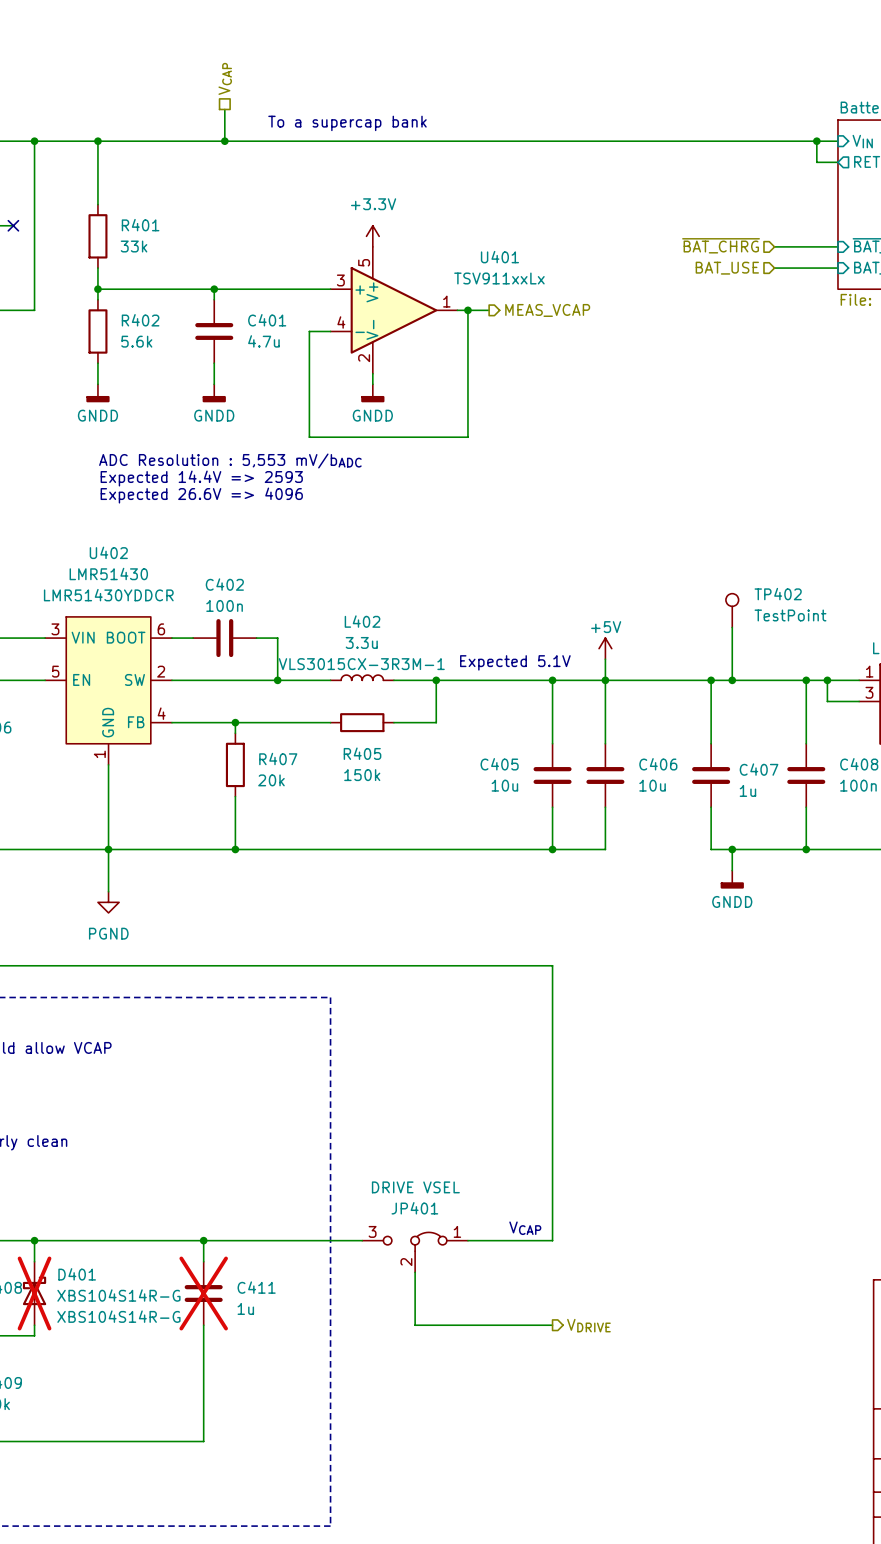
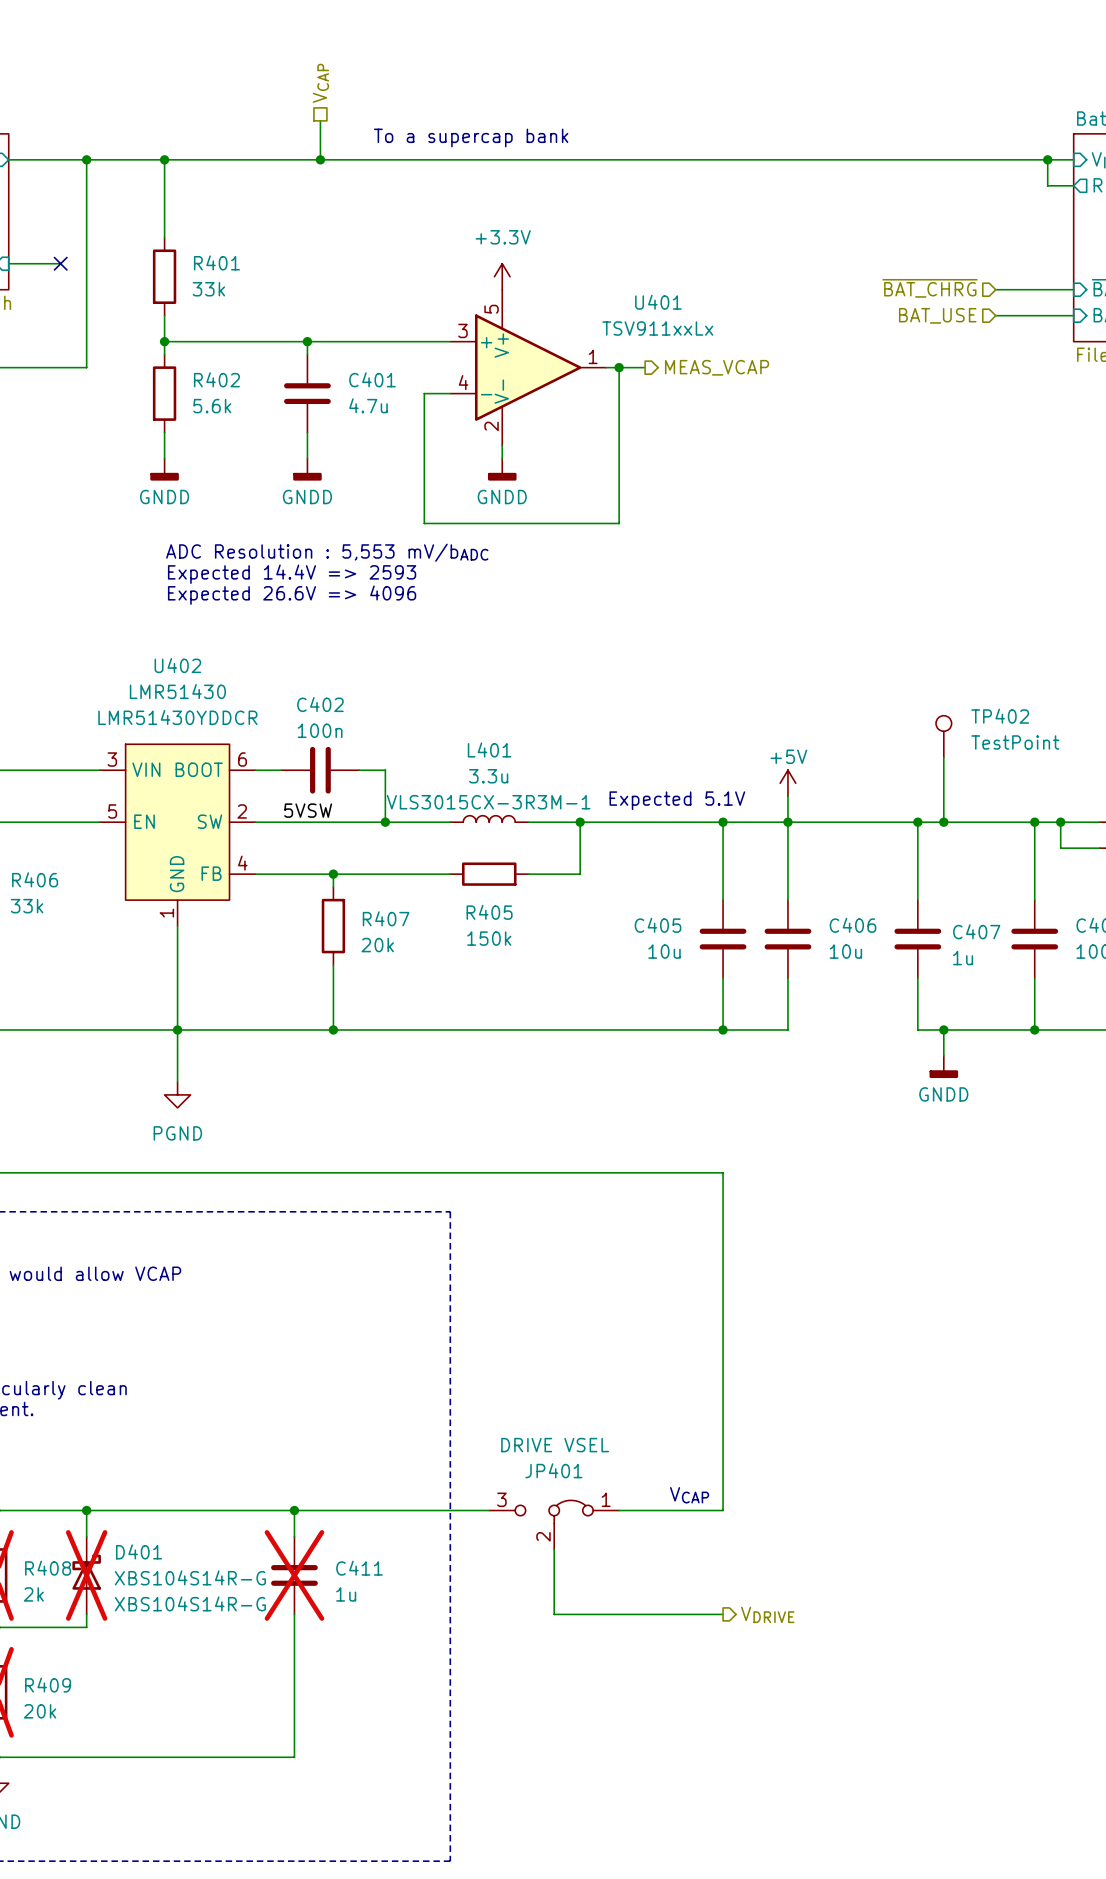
L402 name: L402 (362, 621) -> L401 (489, 749)
label: none -> 5VSW (308, 810)

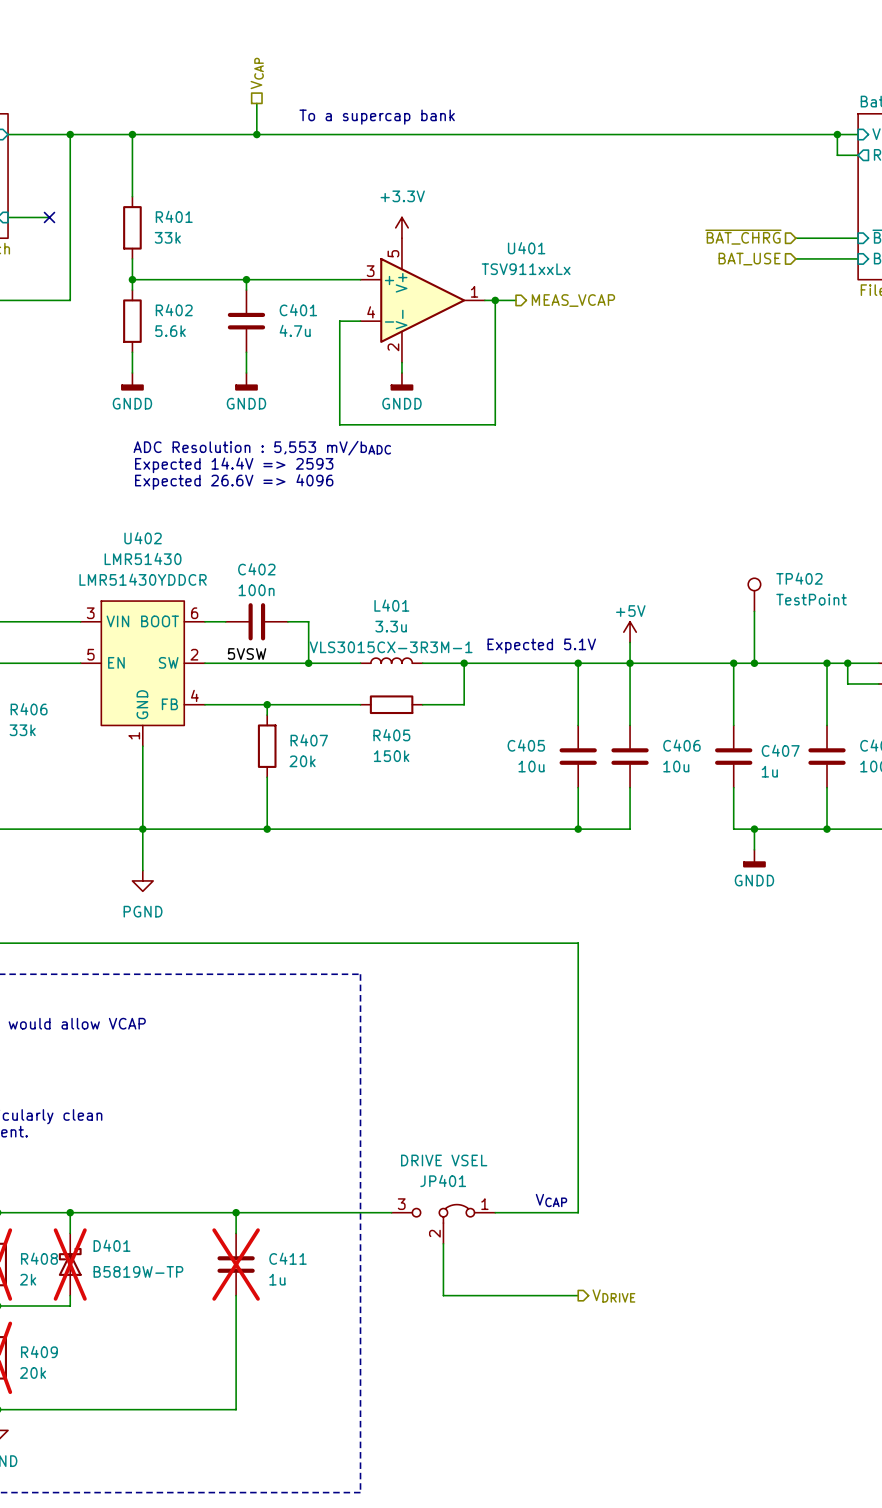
D401 value: XBS104S14R-G (190, 1577) -> B5819W-TP (138, 1271)
D401 text: XBS104S14R-G (190, 1603) -> none

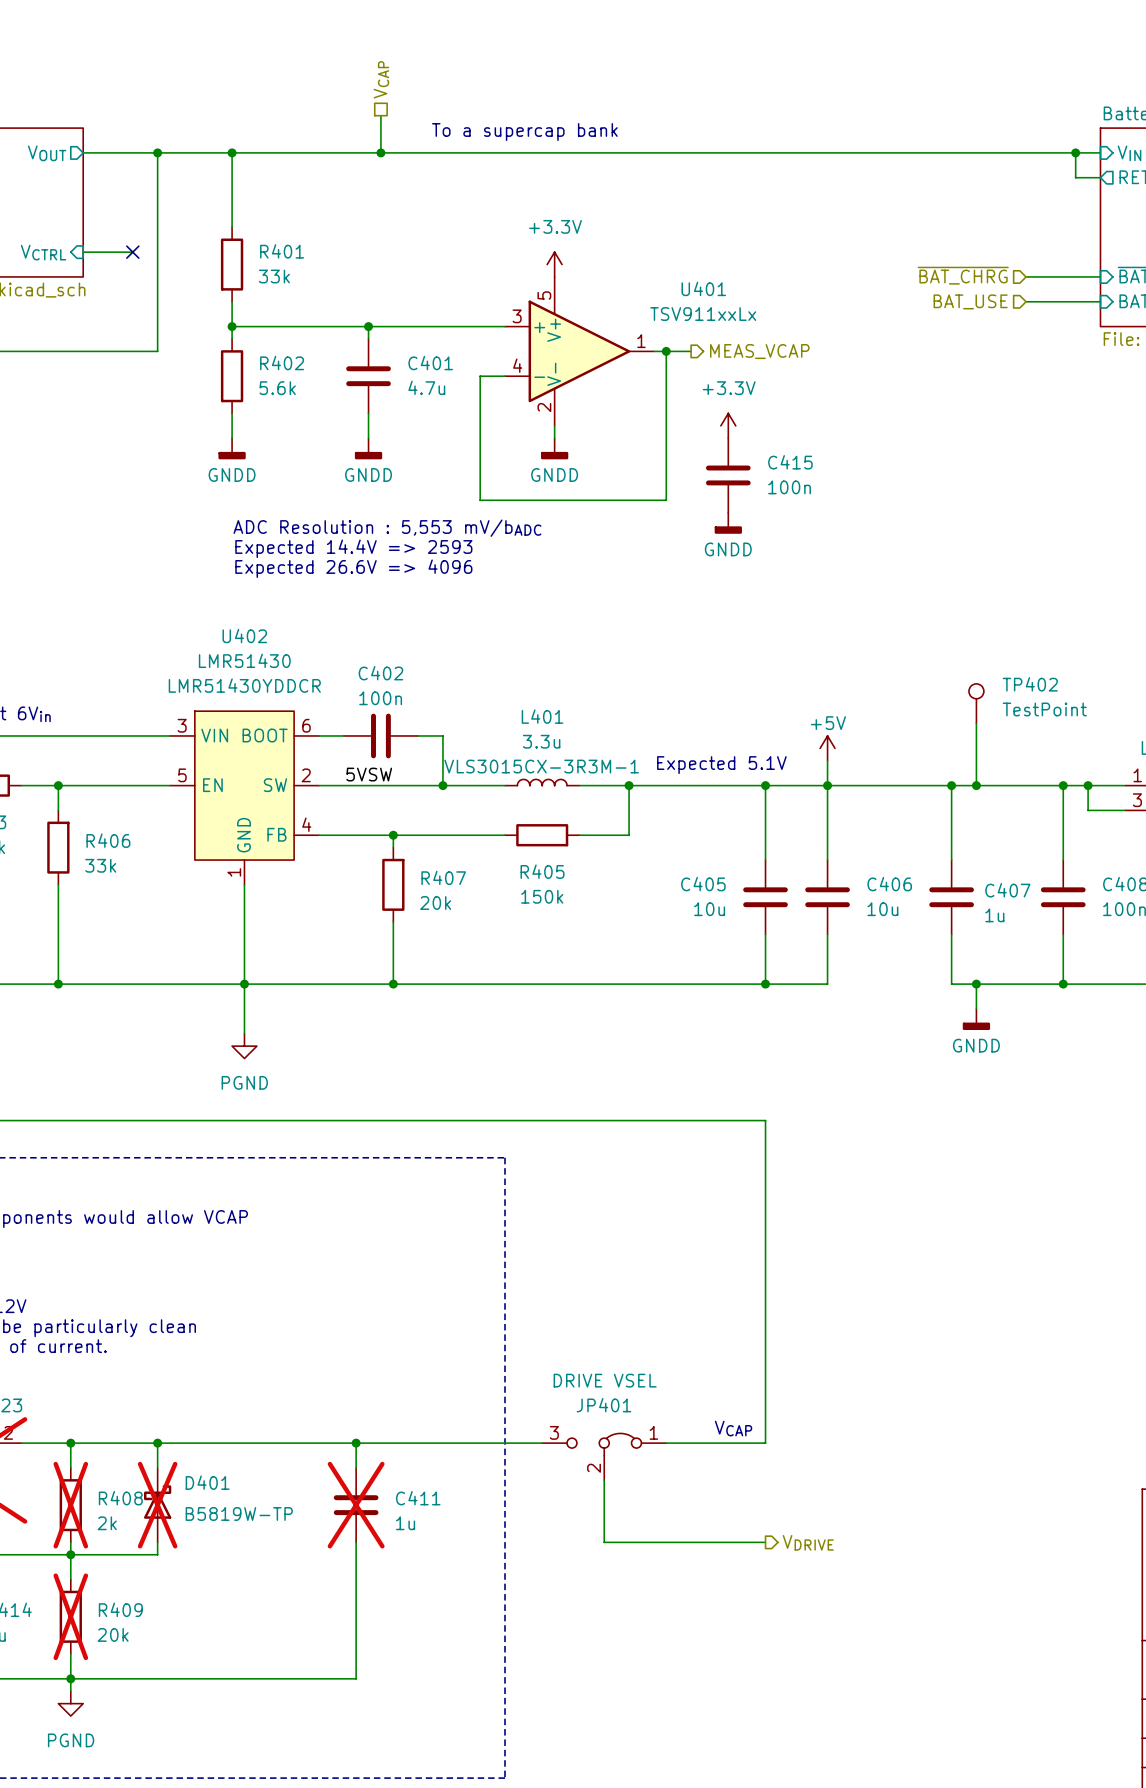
power symbol: none -> +3.3V (728, 425)
C415: none -> 100n (728, 475)
power symbol: none -> GNDD (728, 523)

